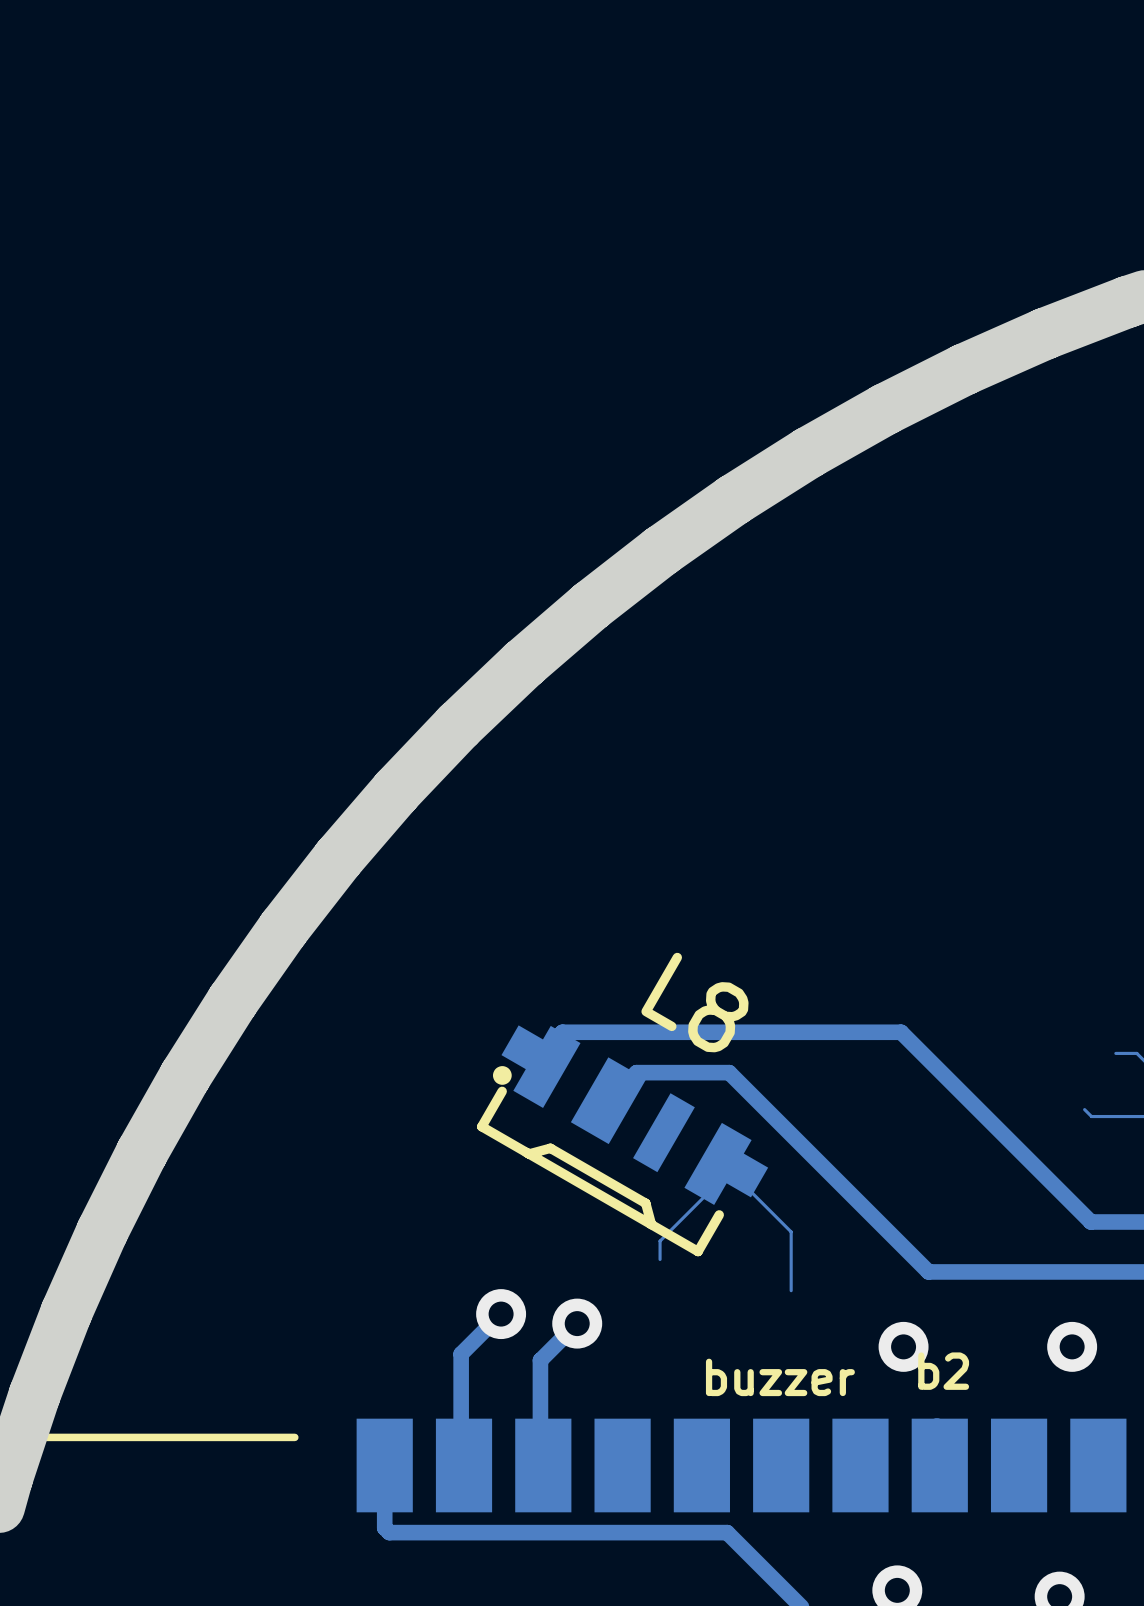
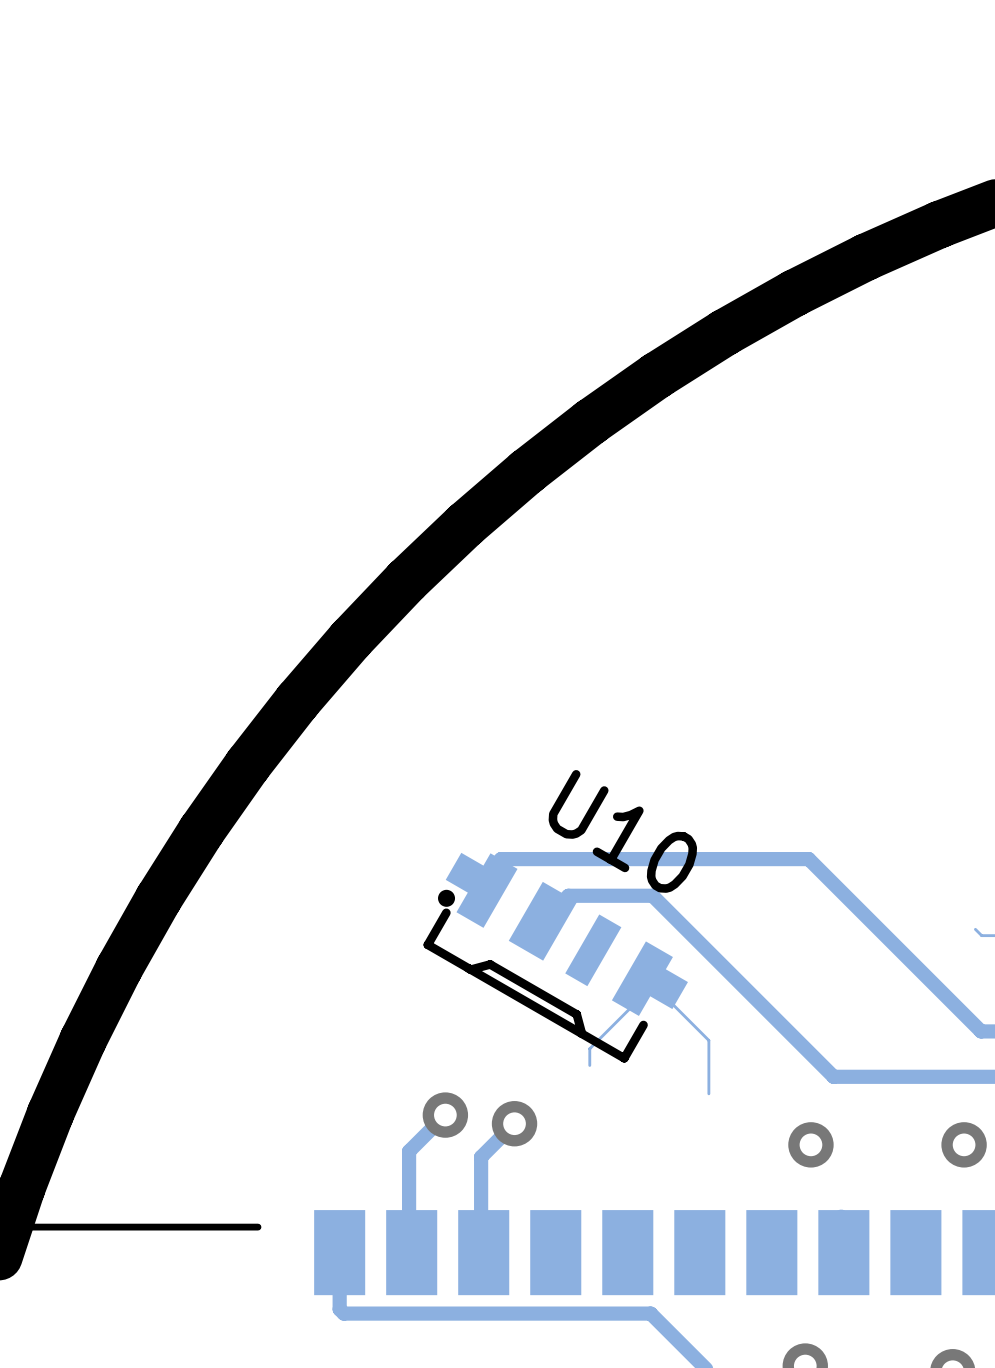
L8 name: L8 (694, 1002) -> U10 (622, 831)
text: b2 (943, 1371) -> none
text: buzzer (780, 1377) -> none

